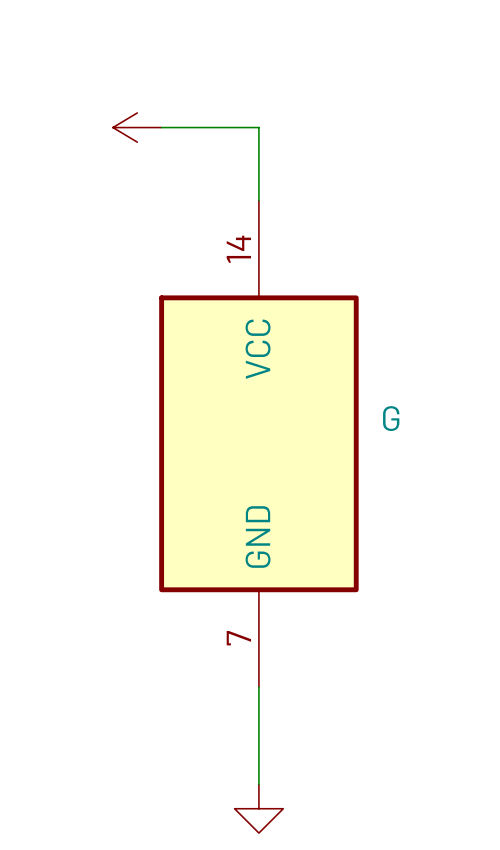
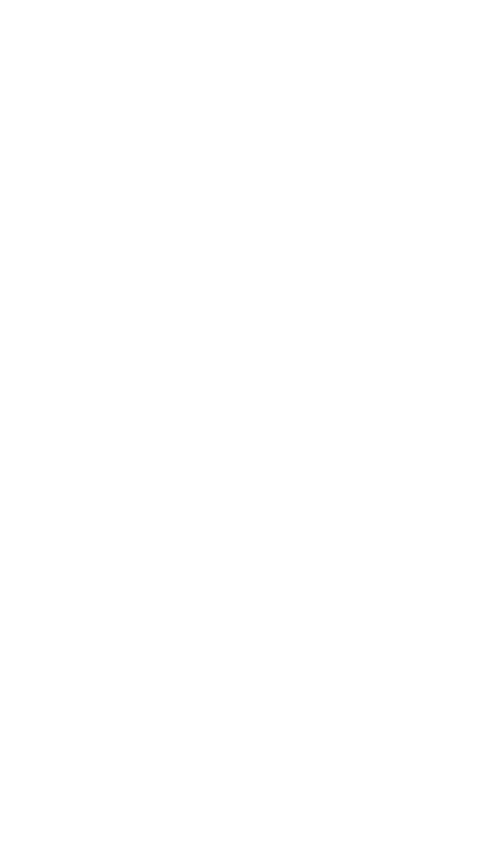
power symbol: (137, 127) -> none
wire: (161, 127) (258, 127) (258, 200) -> none
G: (258, 443) -> none
wire: (258, 687) (258, 784) -> none
power symbol: (258, 808) -> none

